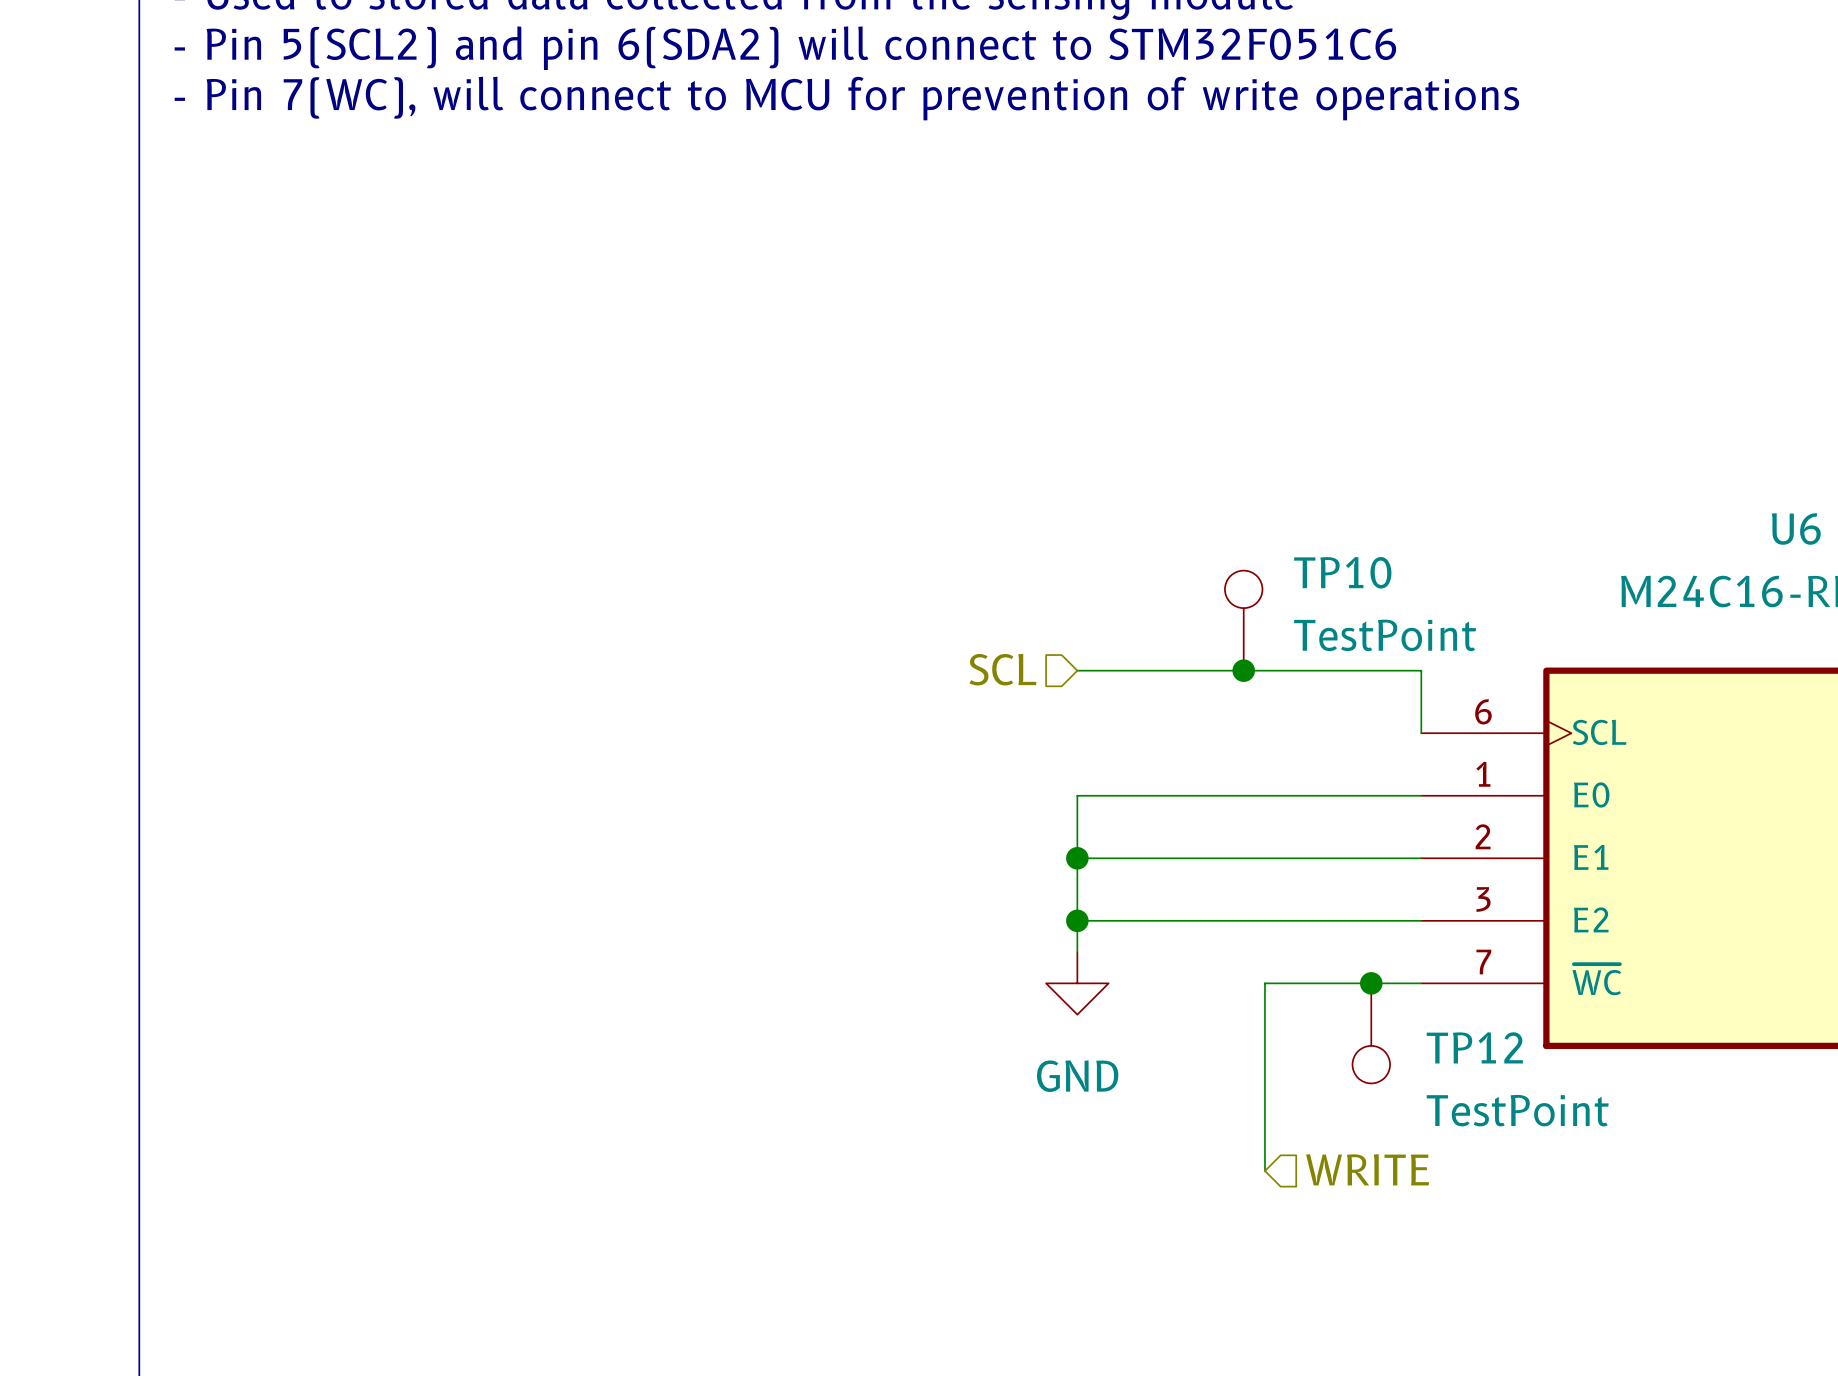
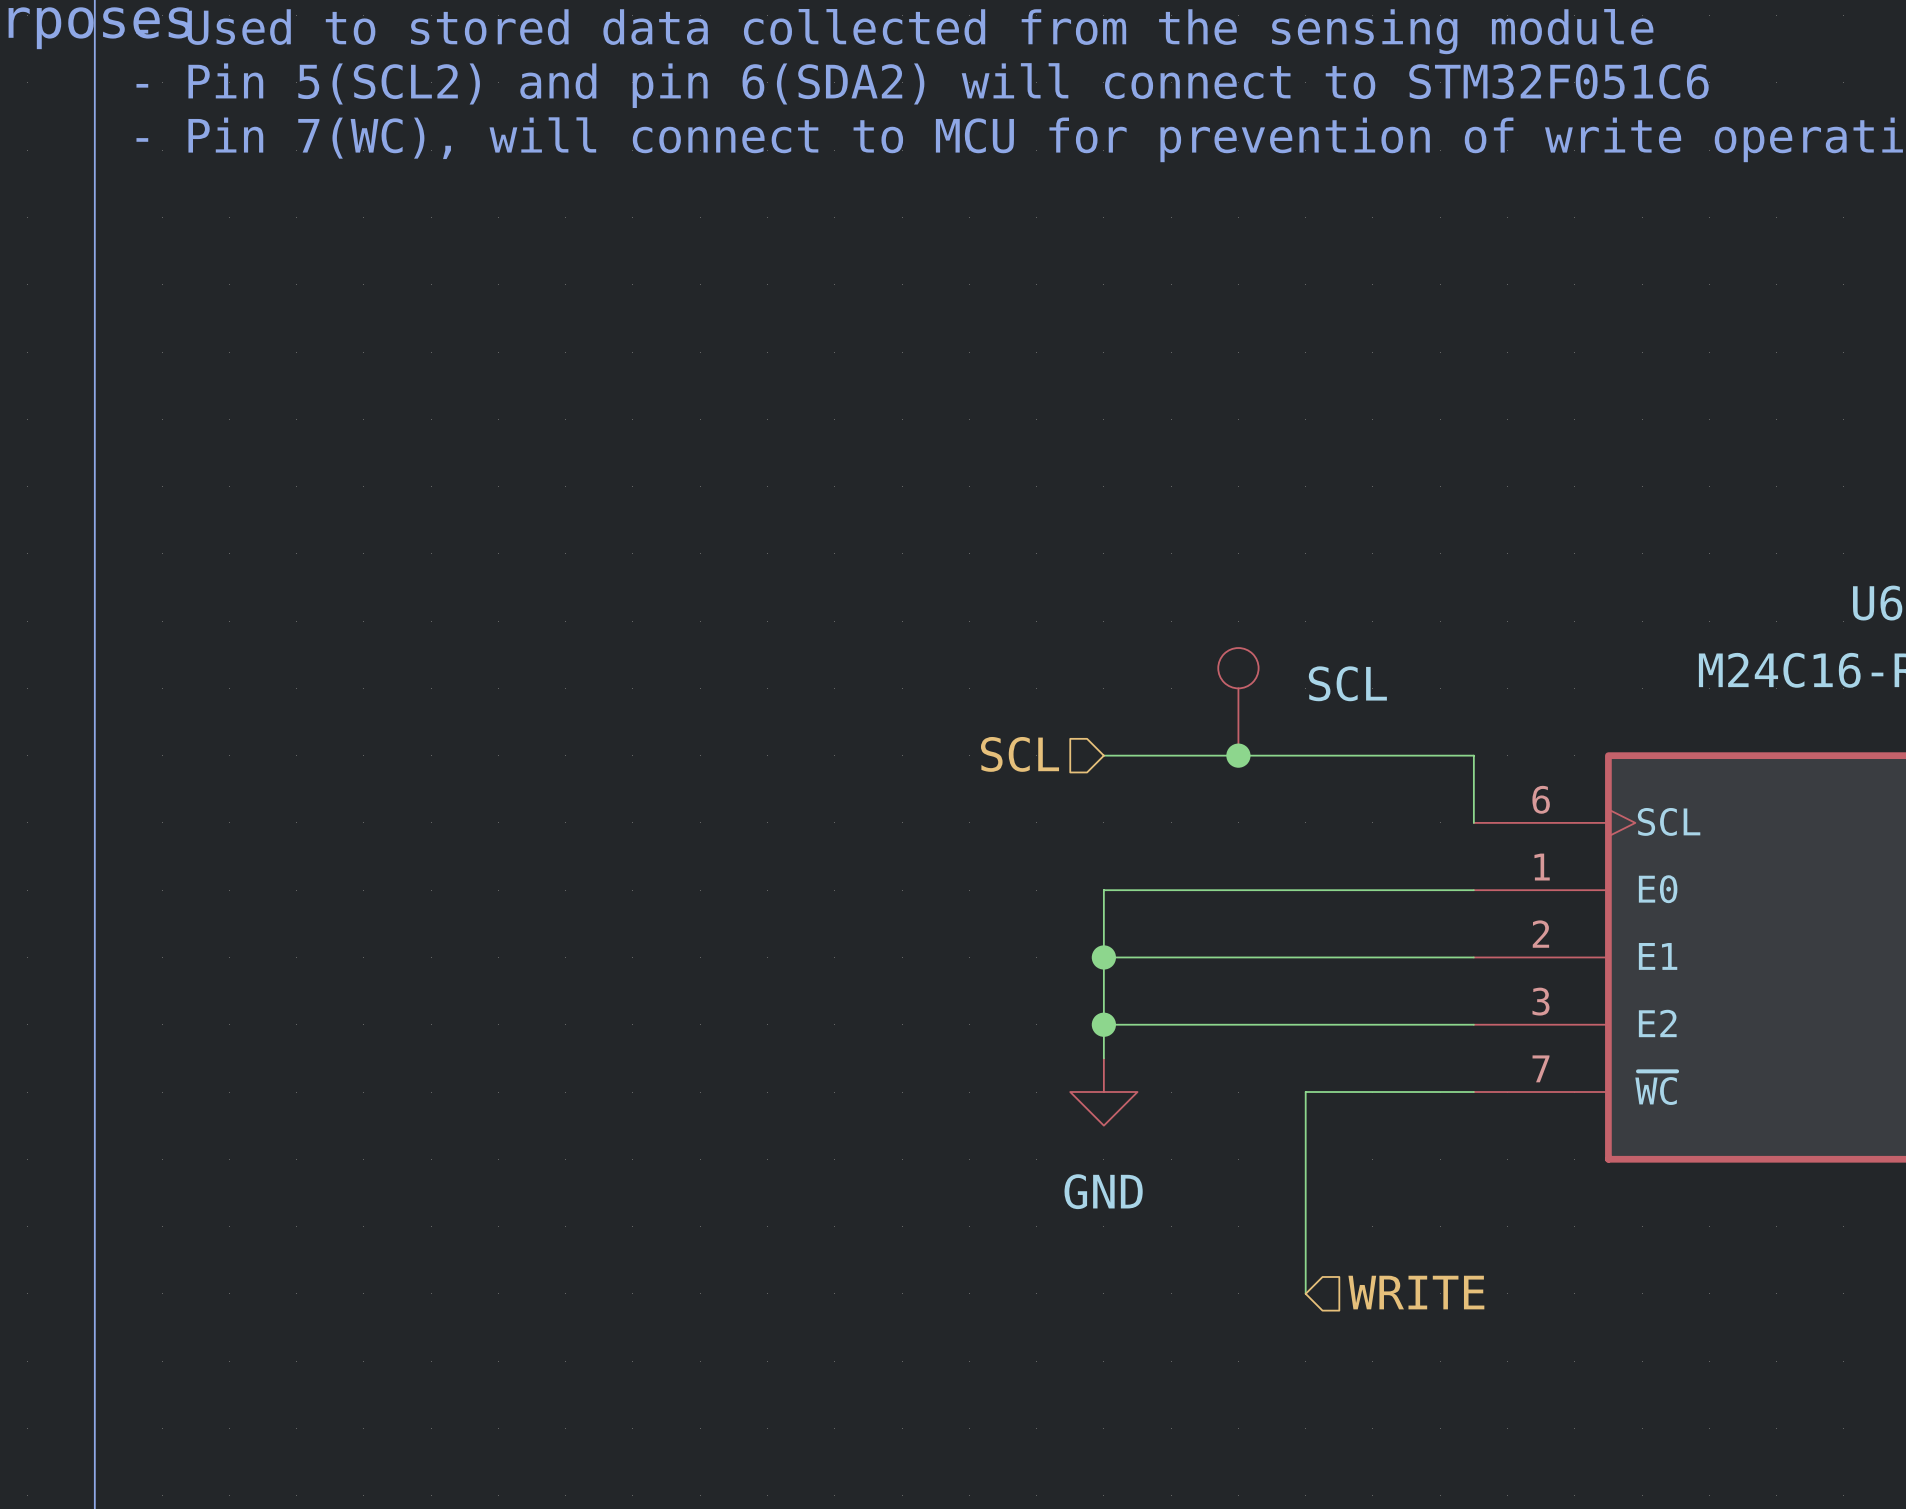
part: none -> SCL (1238, 701)
TP10: TestPoint (1243, 620) -> none
junction position: (1243, 670) -> (1238, 755)
junction: (1371, 983) -> none
TP12: TestPoint (1371, 1033) -> none

